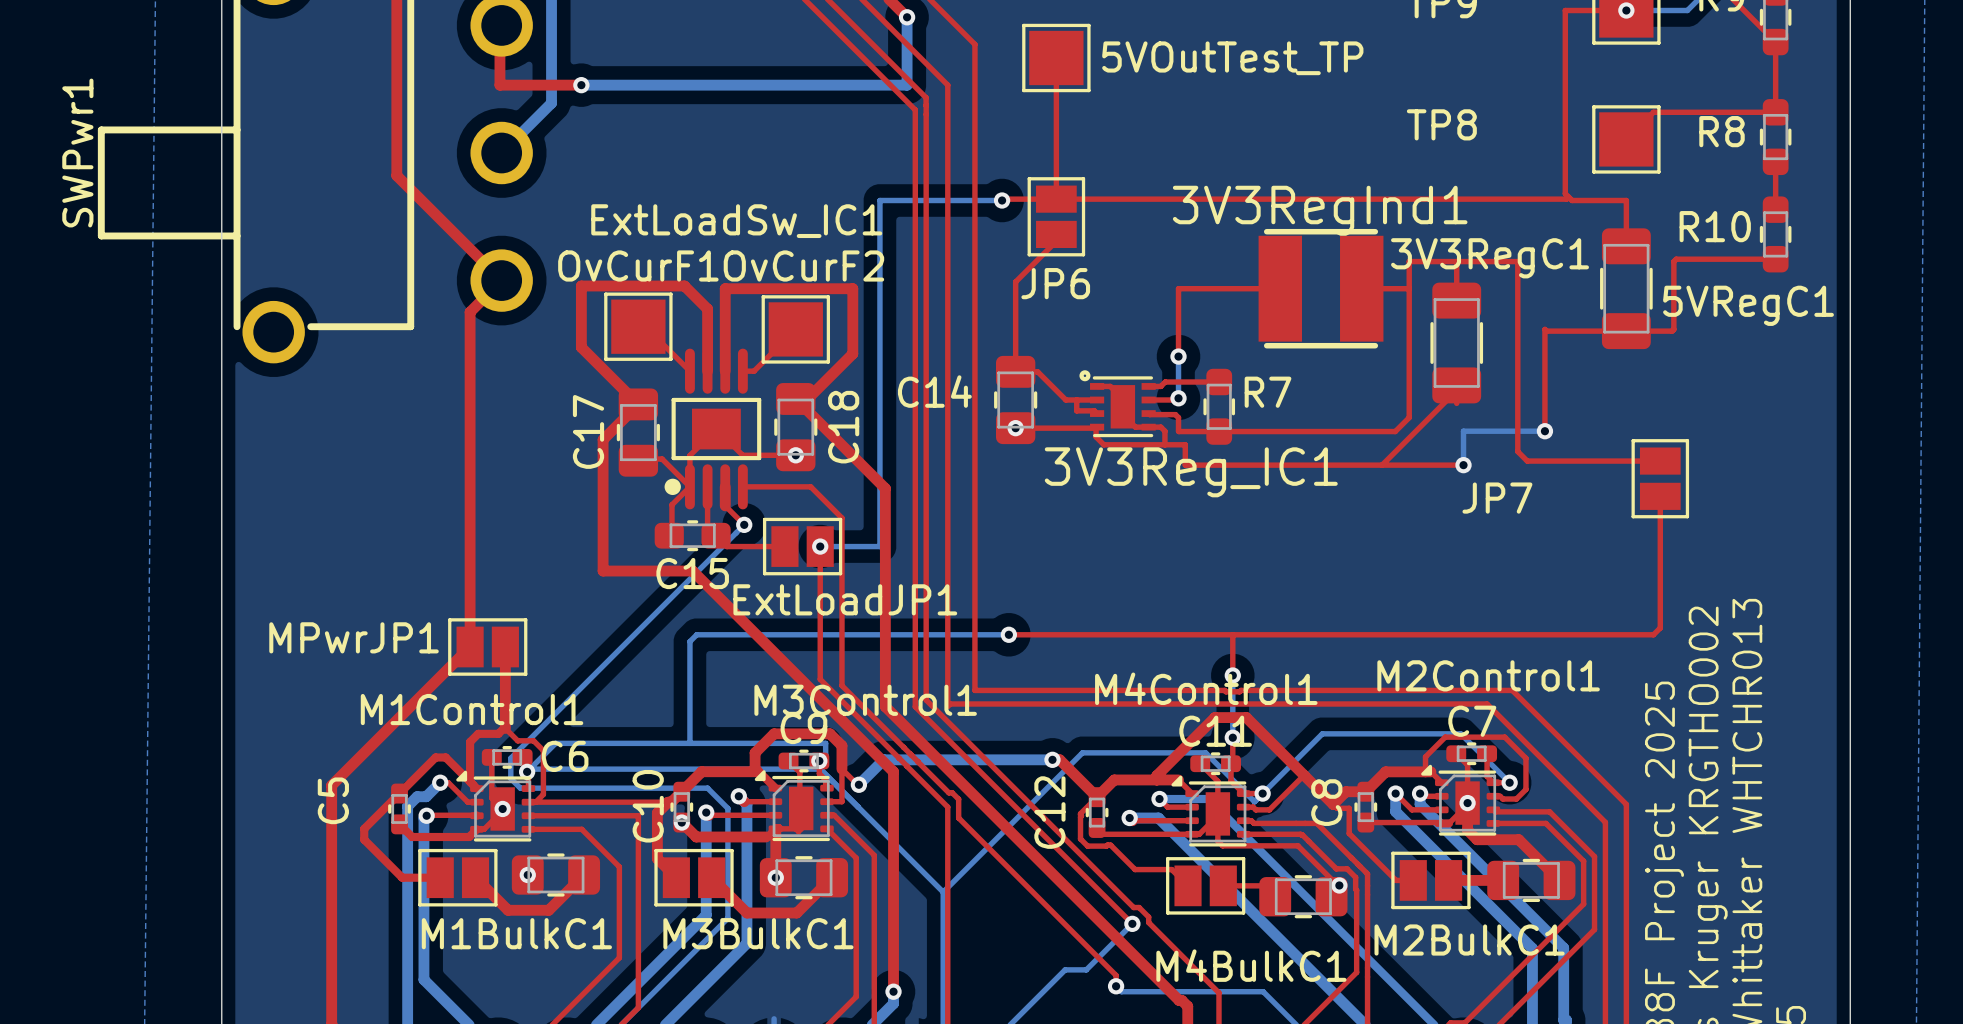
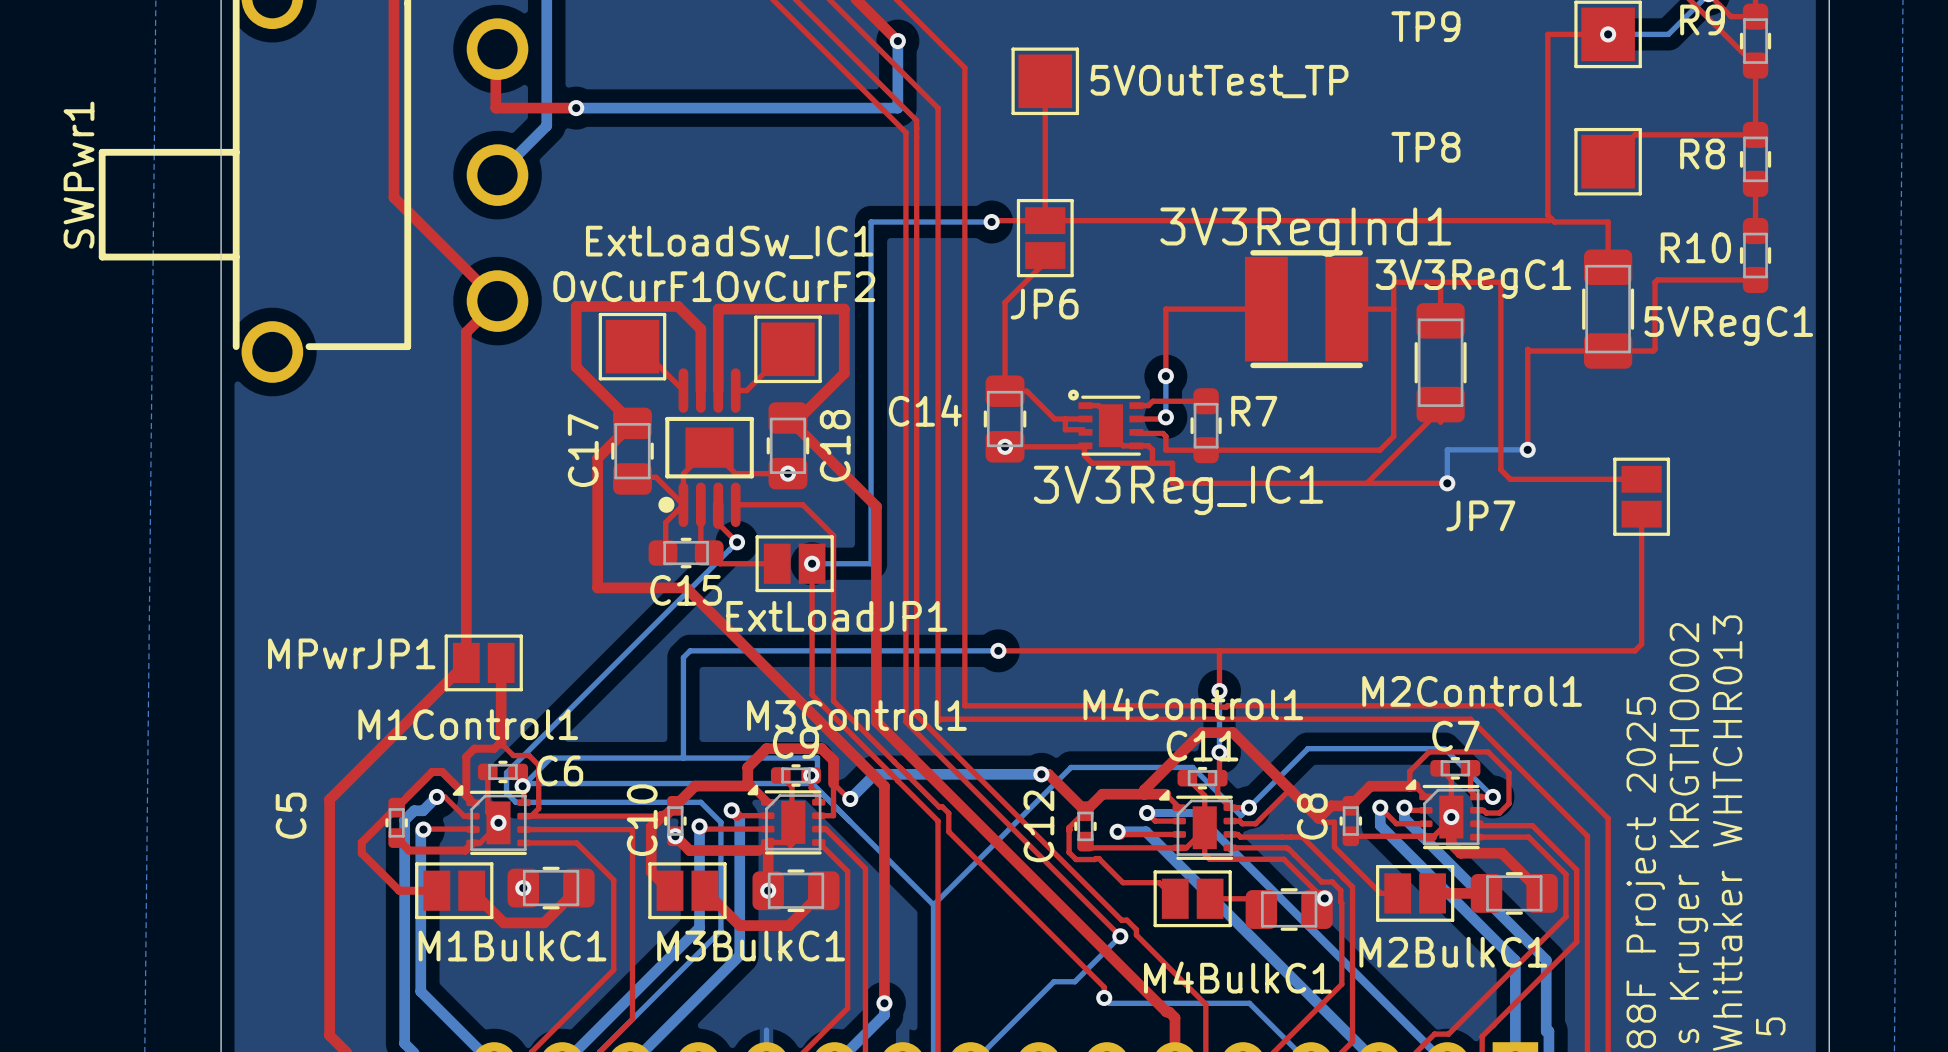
C5 name position: C5 (333, 800) -> C5 (291, 815)

